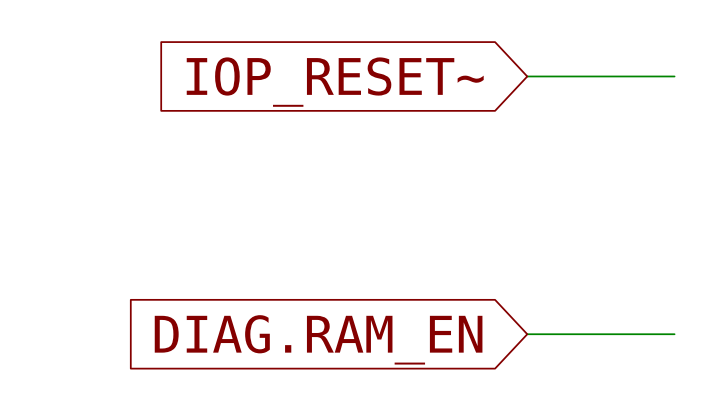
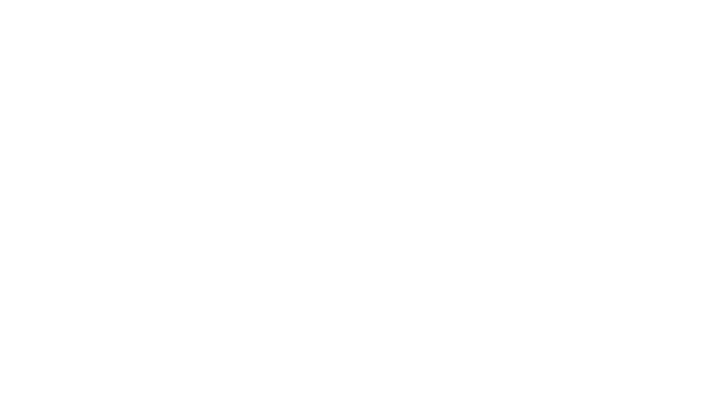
wire: (527, 76) (674, 76) -> none
global label: IOP_RESET~ (335, 82) -> none
wire: (527, 334) (674, 334) -> none
global label: DIAG.RAM_EN (318, 339) -> none

